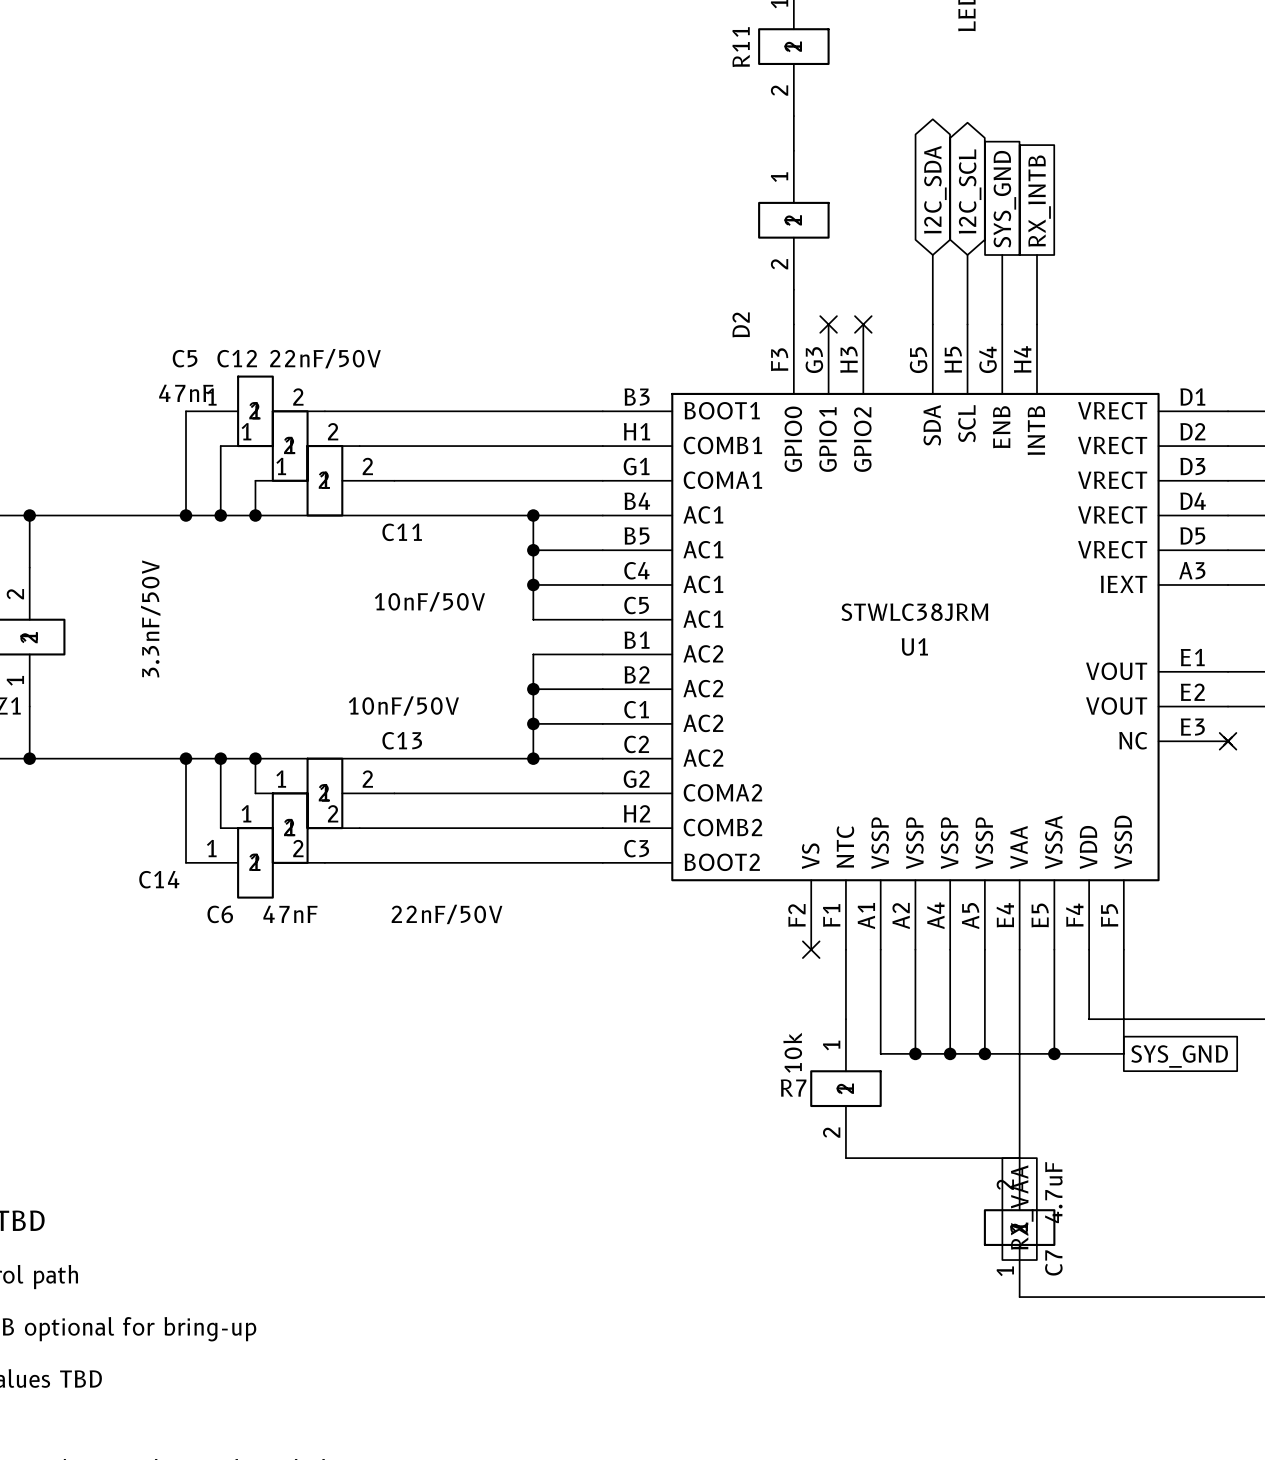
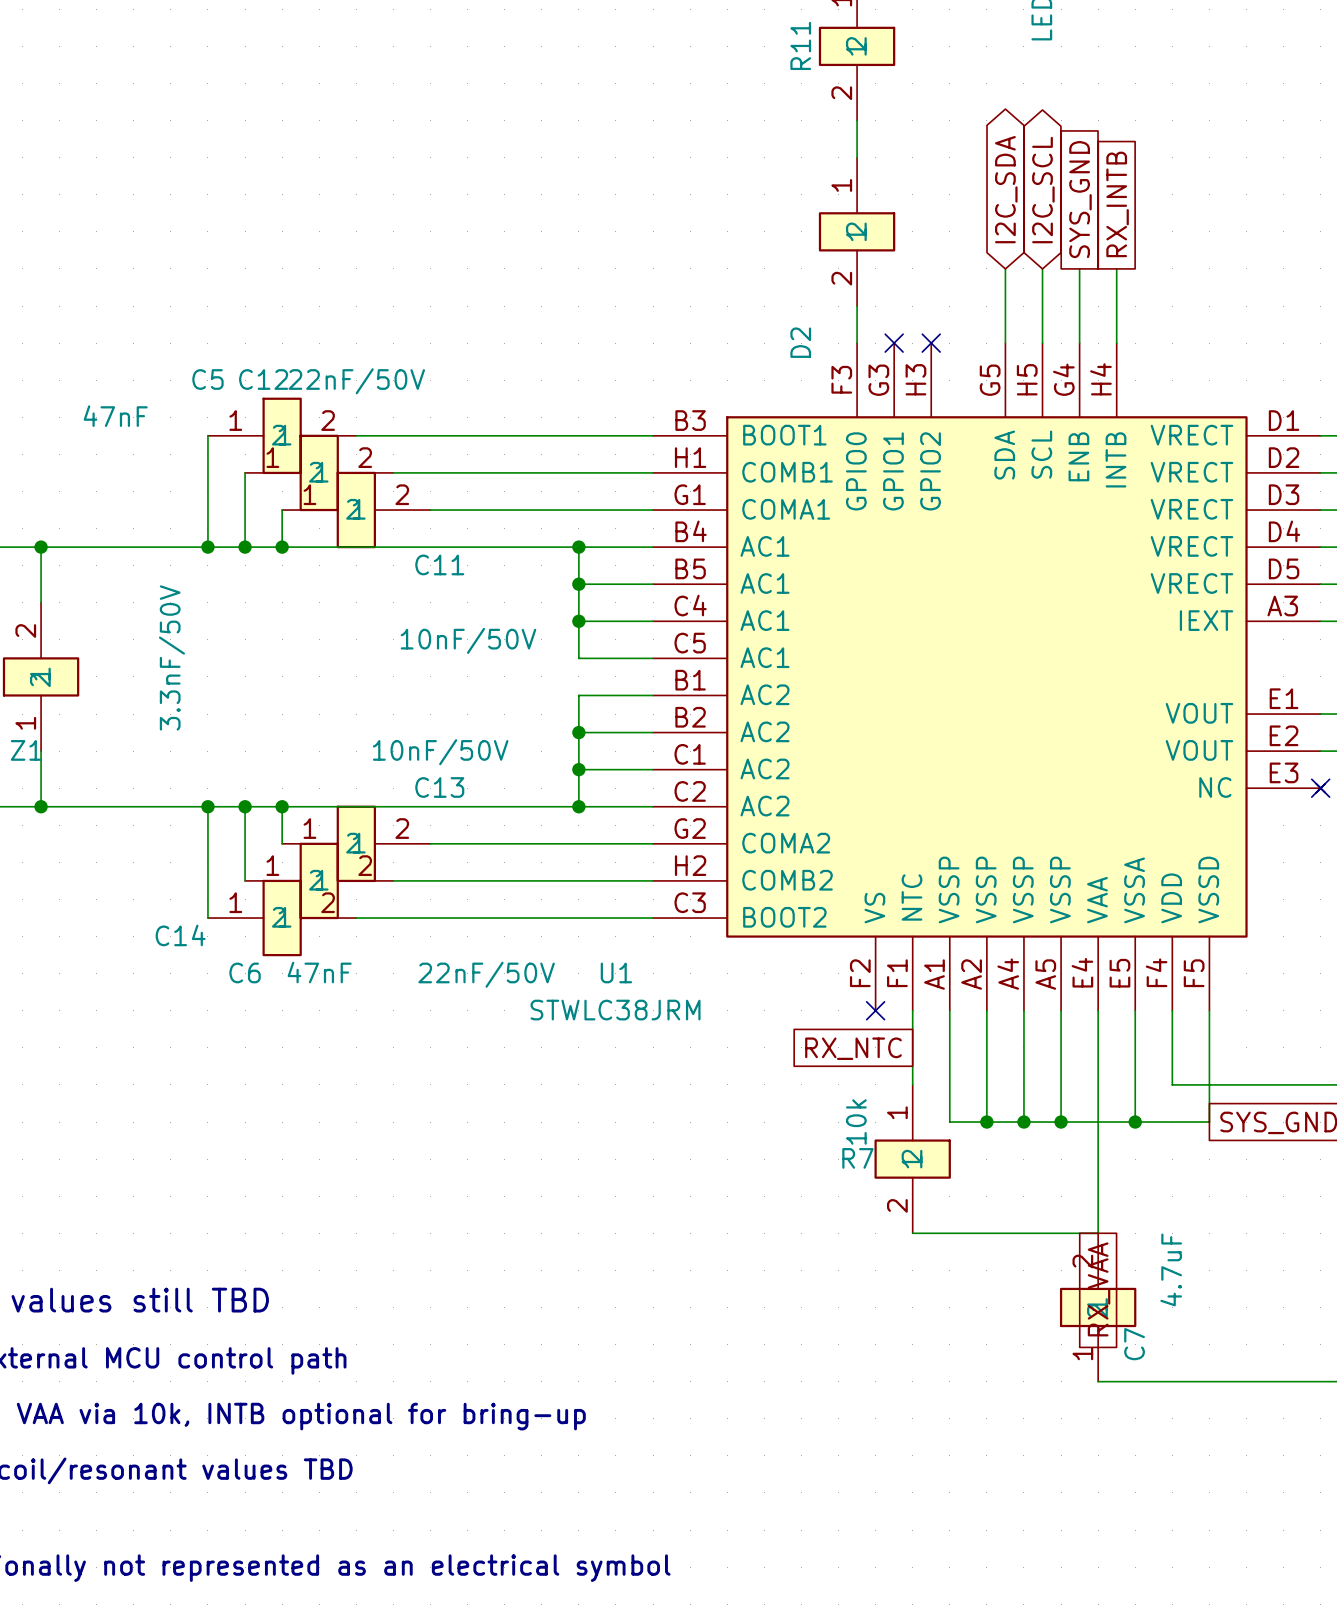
C5 value position: 47nF (186, 393) -> 47nF (115, 416)
U1 value position: STWLC38JRM (914, 612) -> STWLC38JRM (615, 1010)
U1 name position: U1 (914, 646) -> U1 (616, 972)
global label: none -> RX_NTC (853, 1048)
C7 value position: 4.7uF (1053, 1192) -> 4.7uF (1171, 1269)

